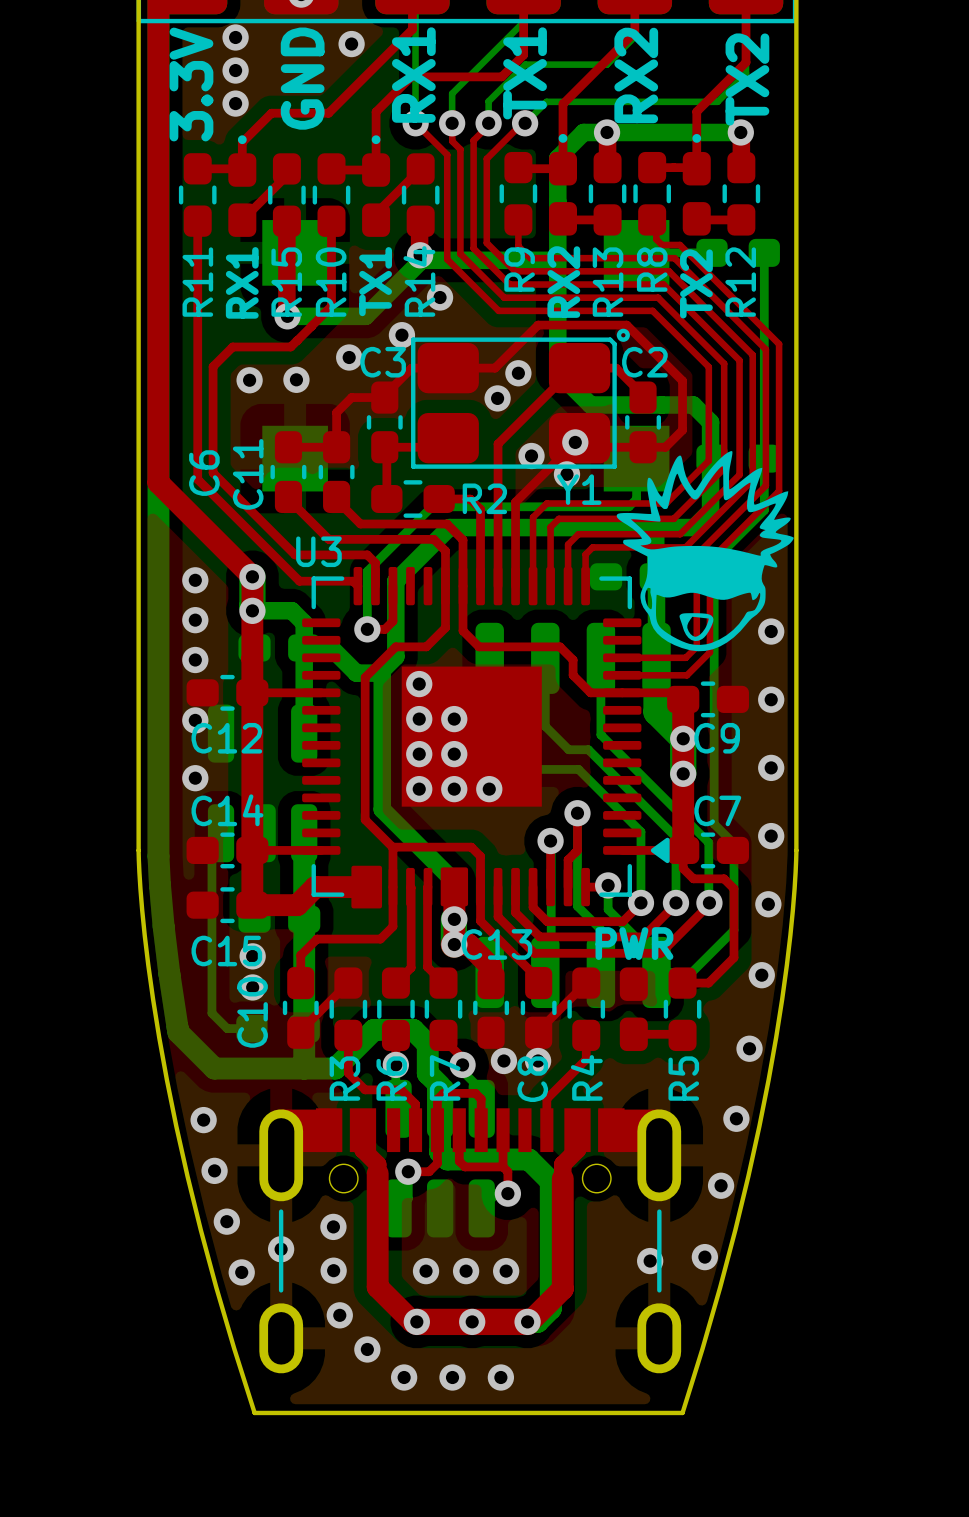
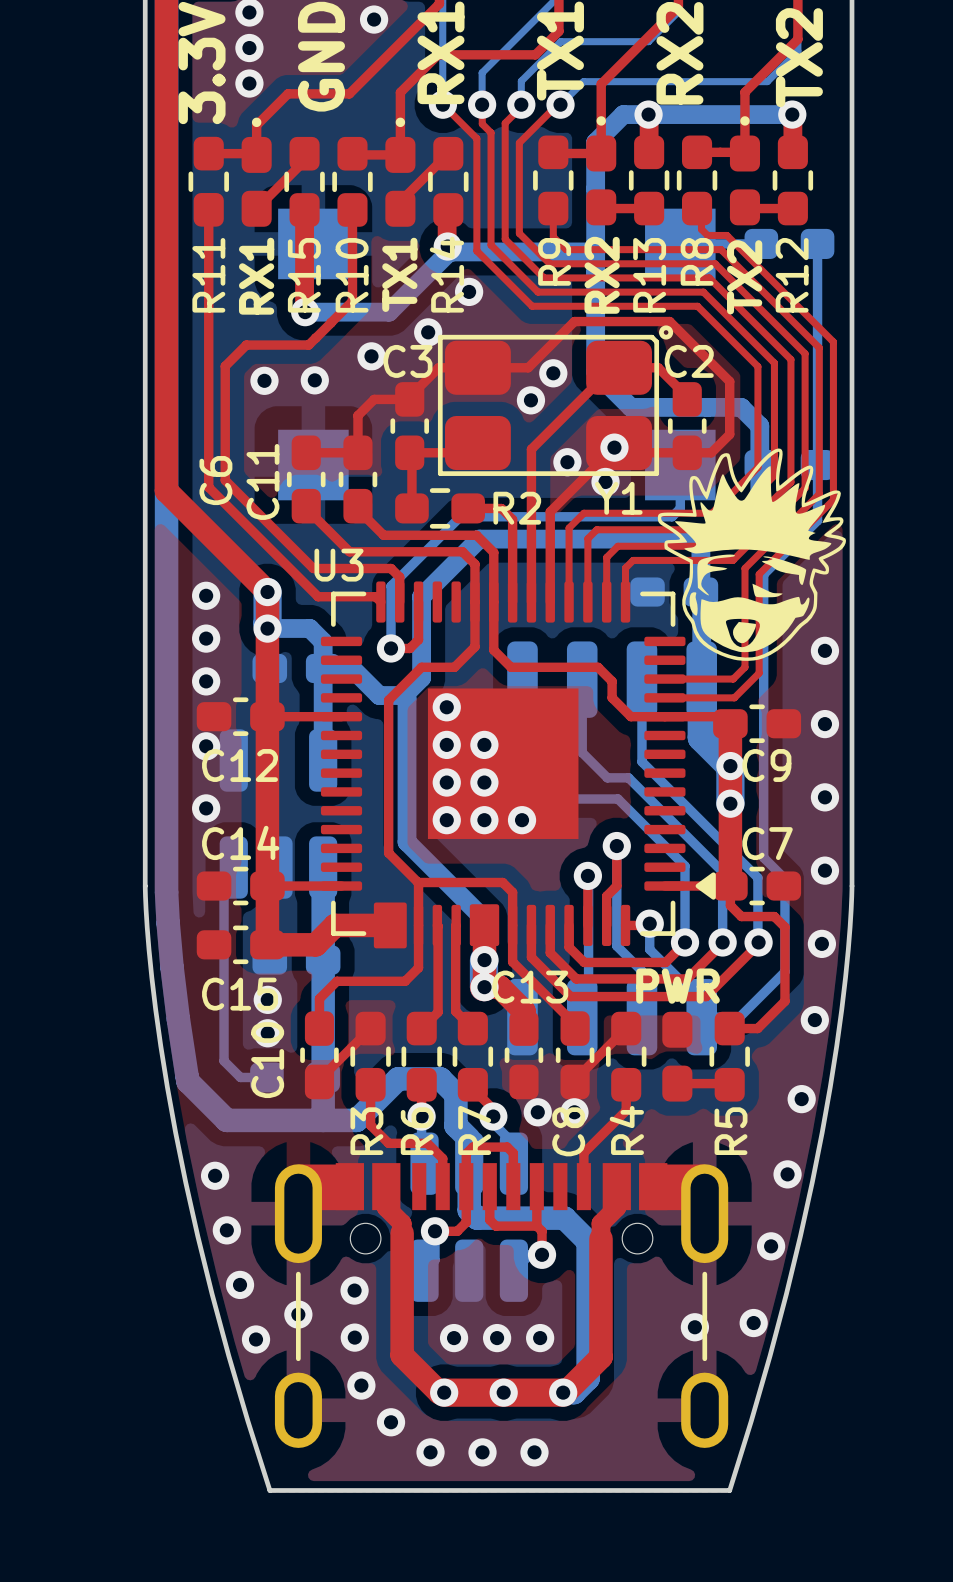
drawing shape: [616, 451, 794, 652] -> [657, 448, 847, 661]

